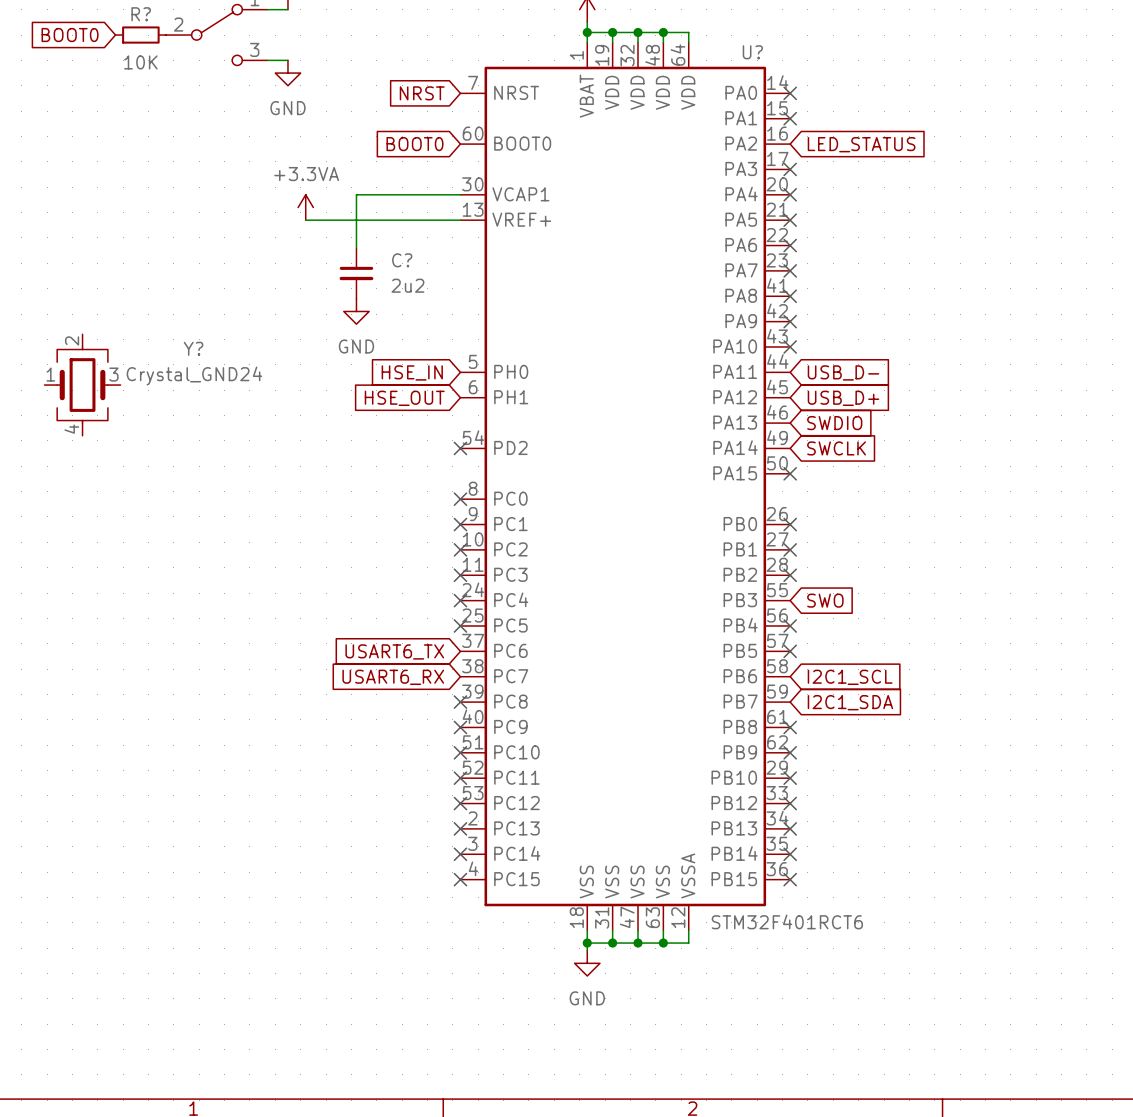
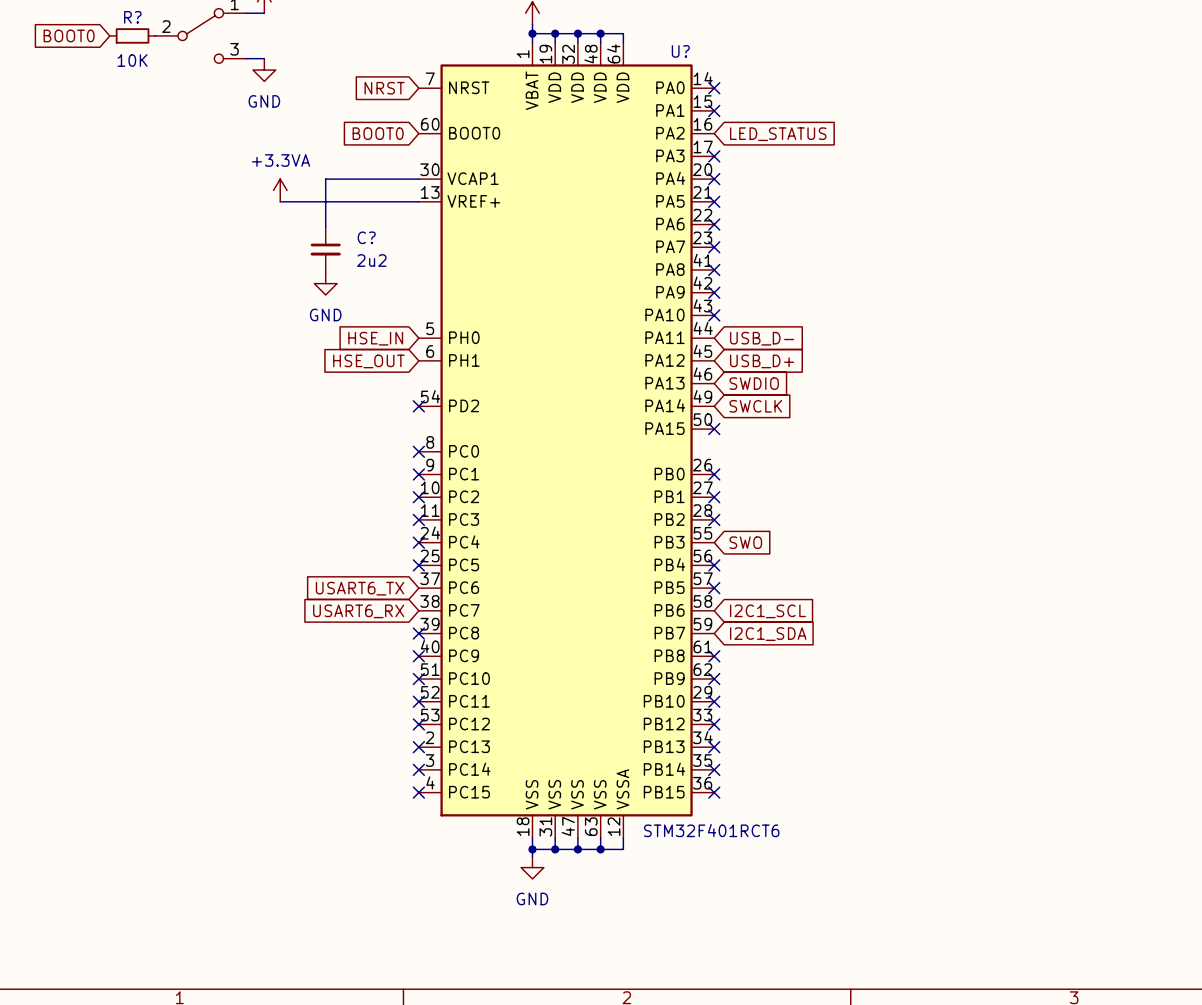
Y?: Crystal_GND24 (82, 385) -> none

